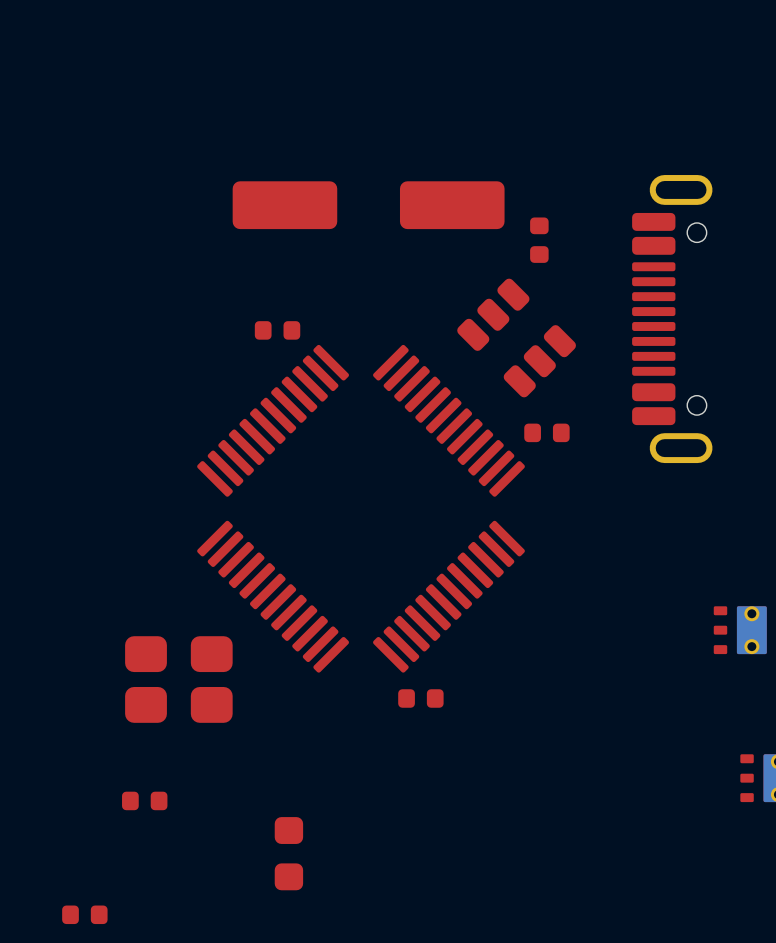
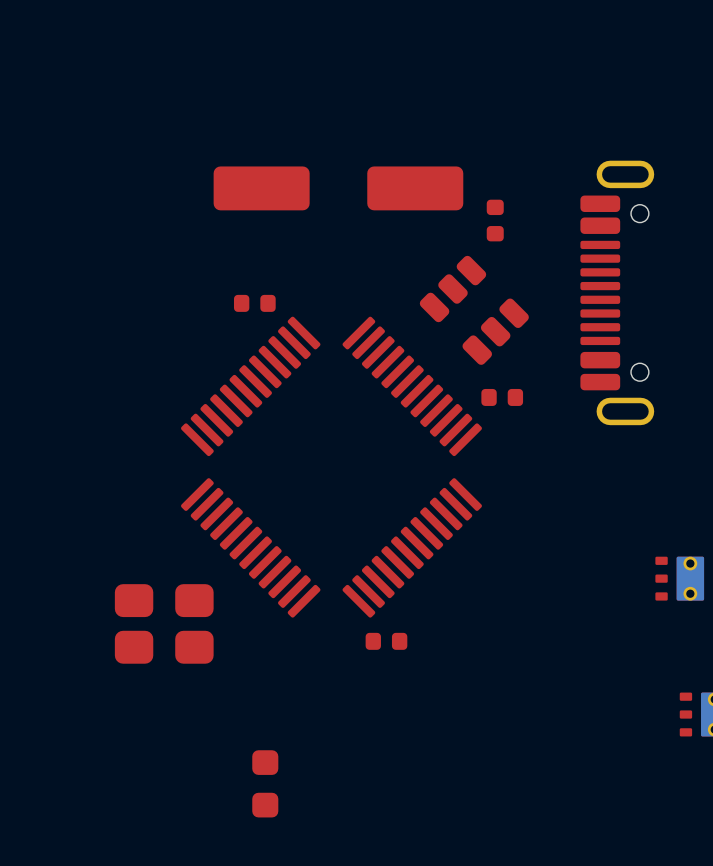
part: (144, 800) -> none
part: (84, 914) -> none

